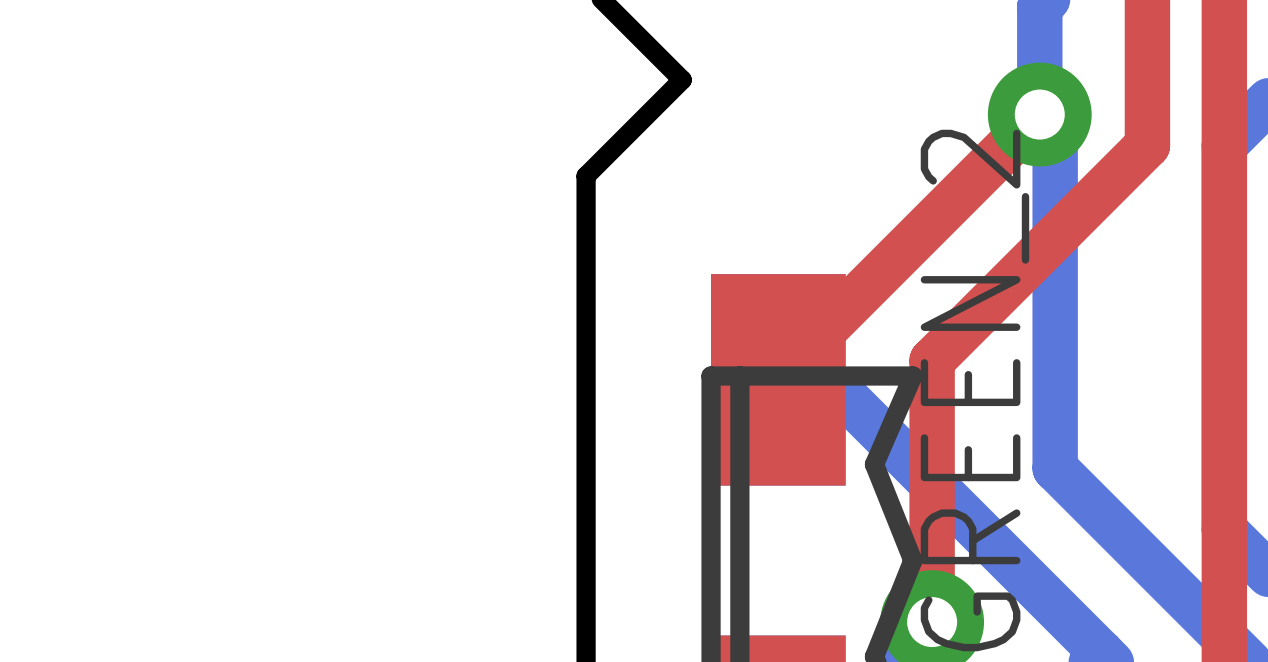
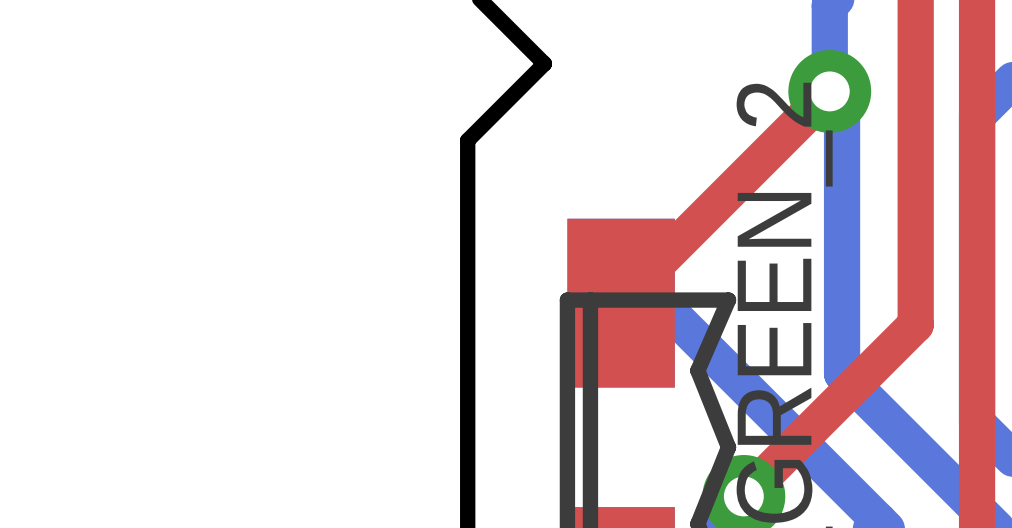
top track: (1147, 145) (932, 360) (932, 622) -> (915, 115) (915, 324) (743, 496)

